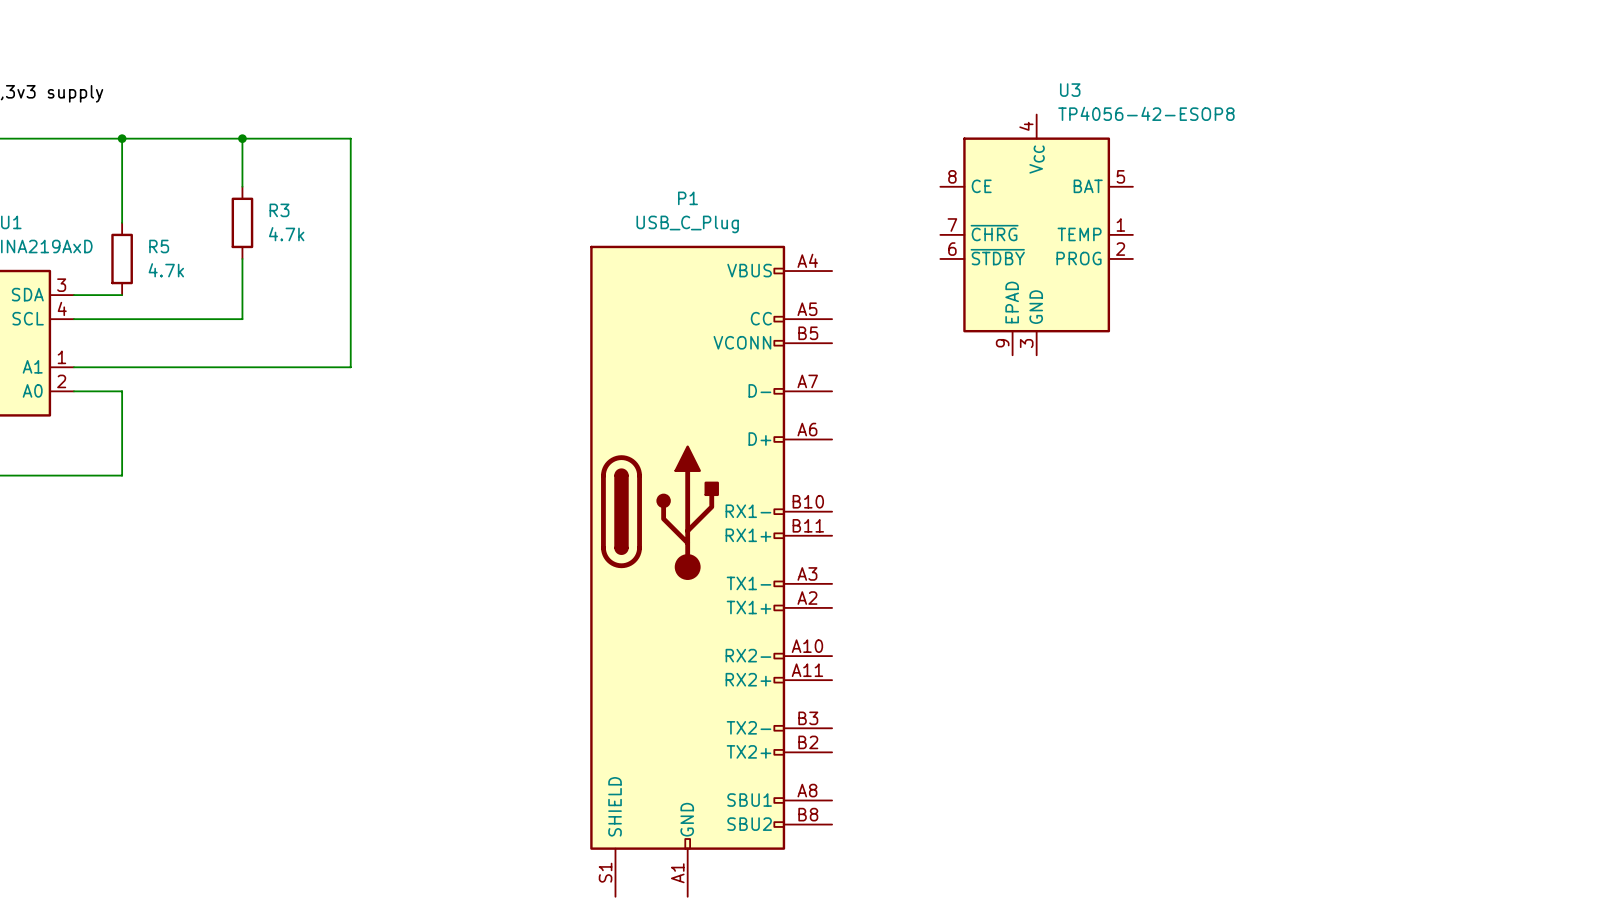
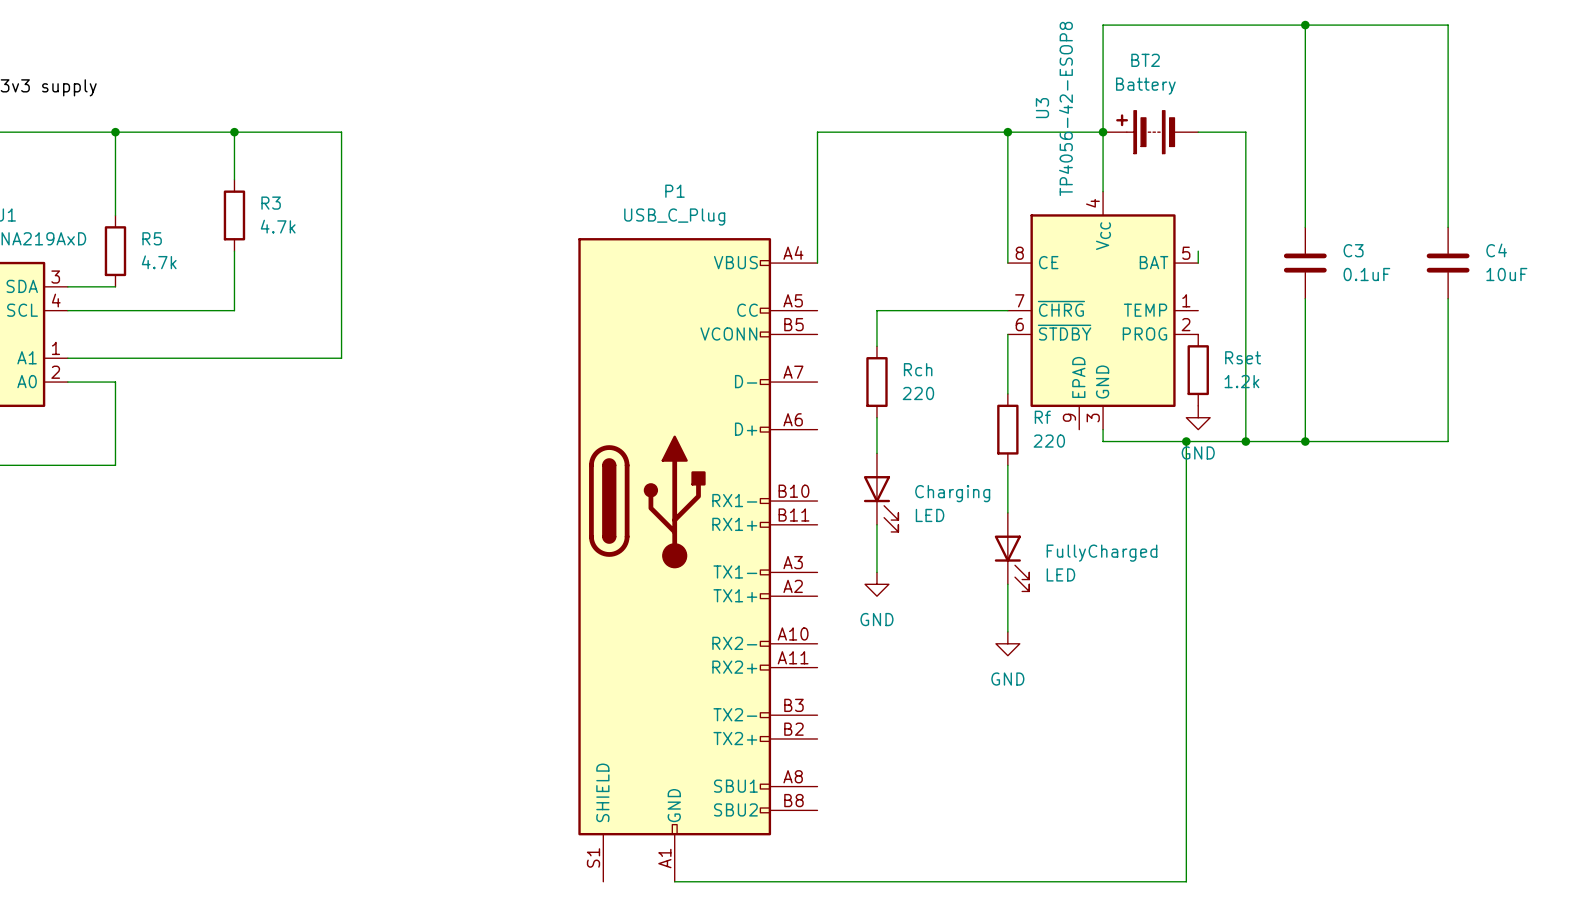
wire: none -> (1305, 25) (1305, 227)
junction: none -> (1305, 25)
U3 name rotation: 0° (1070, 90) -> 90° counterclockwise (1042, 108)
U3 value rotation: 0° (1146, 113) -> 90° counterclockwise (1065, 108)
junction: none -> (1007, 132)
wire: none -> (1103, 132) (817, 132) (817, 263)
junction: none -> (1103, 132)
BT2: none -> Battery (1150, 132)
wire: none -> (1198, 132) (1245, 132) (1245, 441)
wire: none -> (1103, 191) (1103, 25) (1448, 25) (1448, 227)
U3 position: (1036, 234) -> (1103, 310)
wire: none -> (1198, 251) (1198, 263)
C3: none -> 0.1uF (1305, 263)
C4: none -> 10uF (1448, 263)
wire: none -> (1305, 298) (1305, 441)
wire: none -> (1448, 298) (1448, 441) (1103, 441) (1103, 429)
wire: none -> (1007, 310) (876, 310) (876, 346)
wire: none -> (1007, 334) (1007, 393)
Rset: none -> 1.2k (1198, 370)
Rch: none -> 220 (876, 382)
wire: none -> (876, 417) (876, 453)
power symbol: none -> GND (1198, 417)
Rf: none -> 220 (1007, 429)
wire: none -> (1186, 441) (1186, 881) (674, 881)
junction: none -> (1186, 441)
junction: none -> (1245, 441)
junction: none -> (1305, 441)
wire: none -> (1007, 465) (1007, 512)
Charging: none -> LED (881, 492)
wire: none -> (876, 524) (876, 572)
FullyCharged: none -> LED (1012, 552)
power symbol: none -> GND (876, 584)
wire: none -> (1007, 584) (1007, 631)
power symbol: none -> GND (1007, 643)

